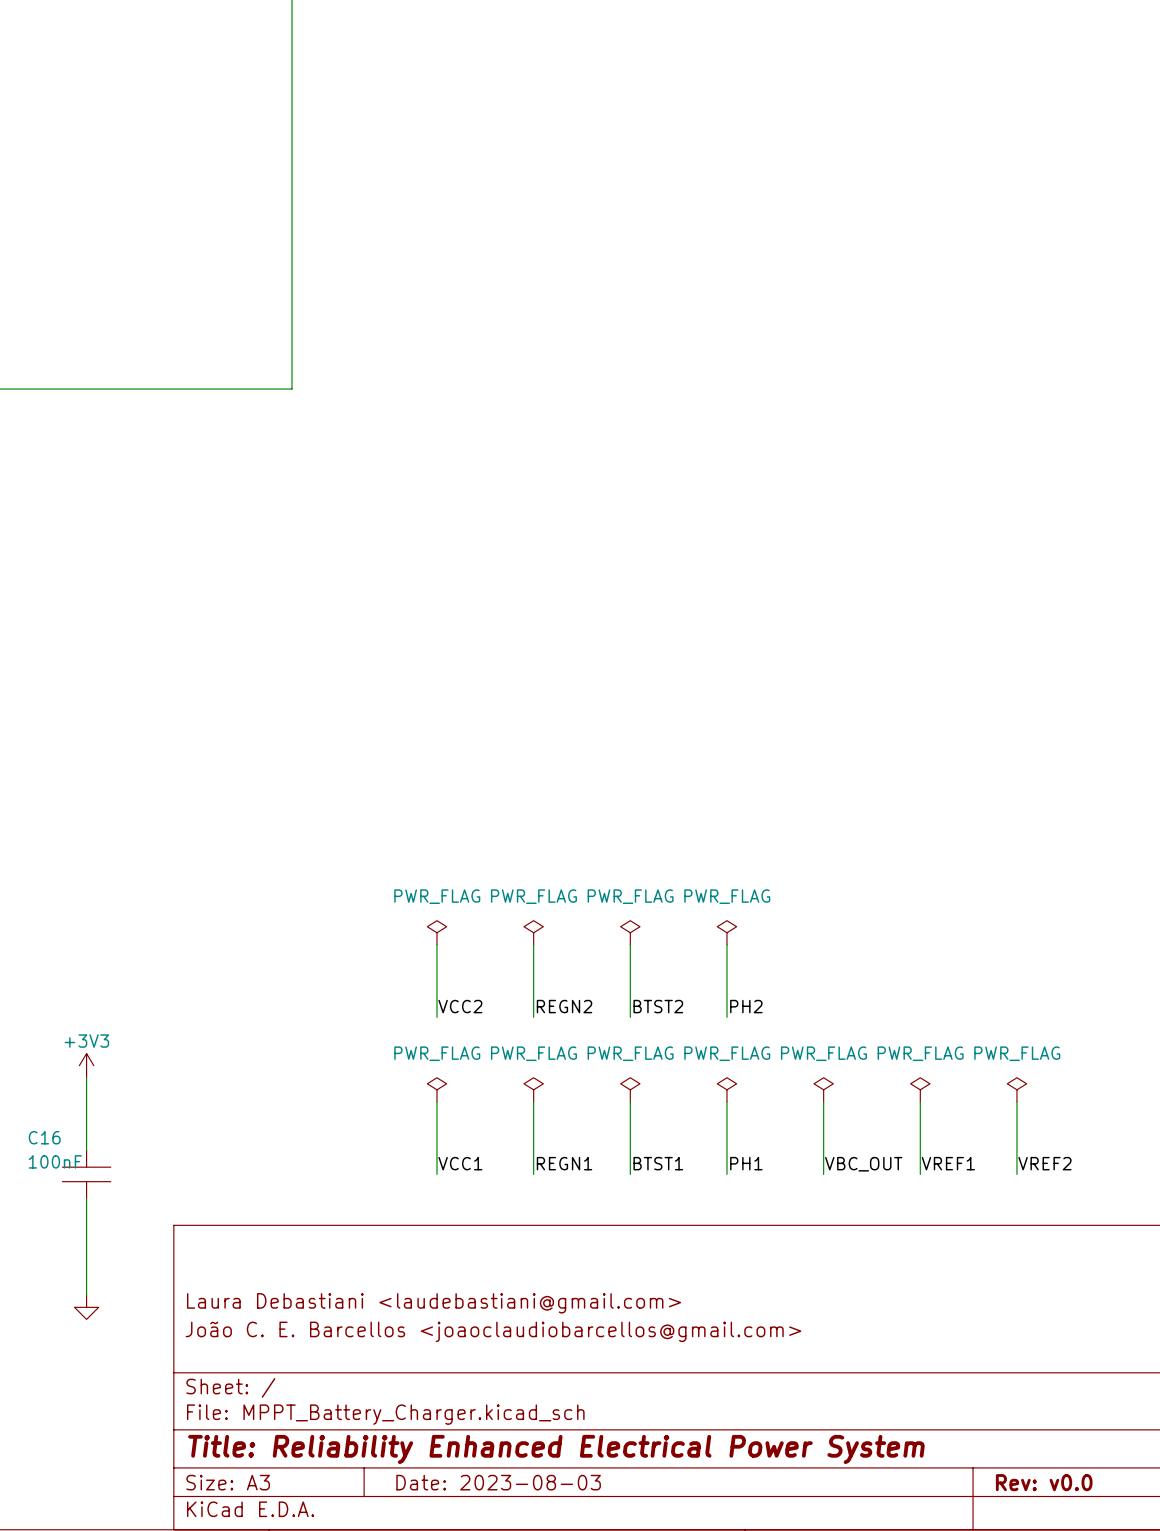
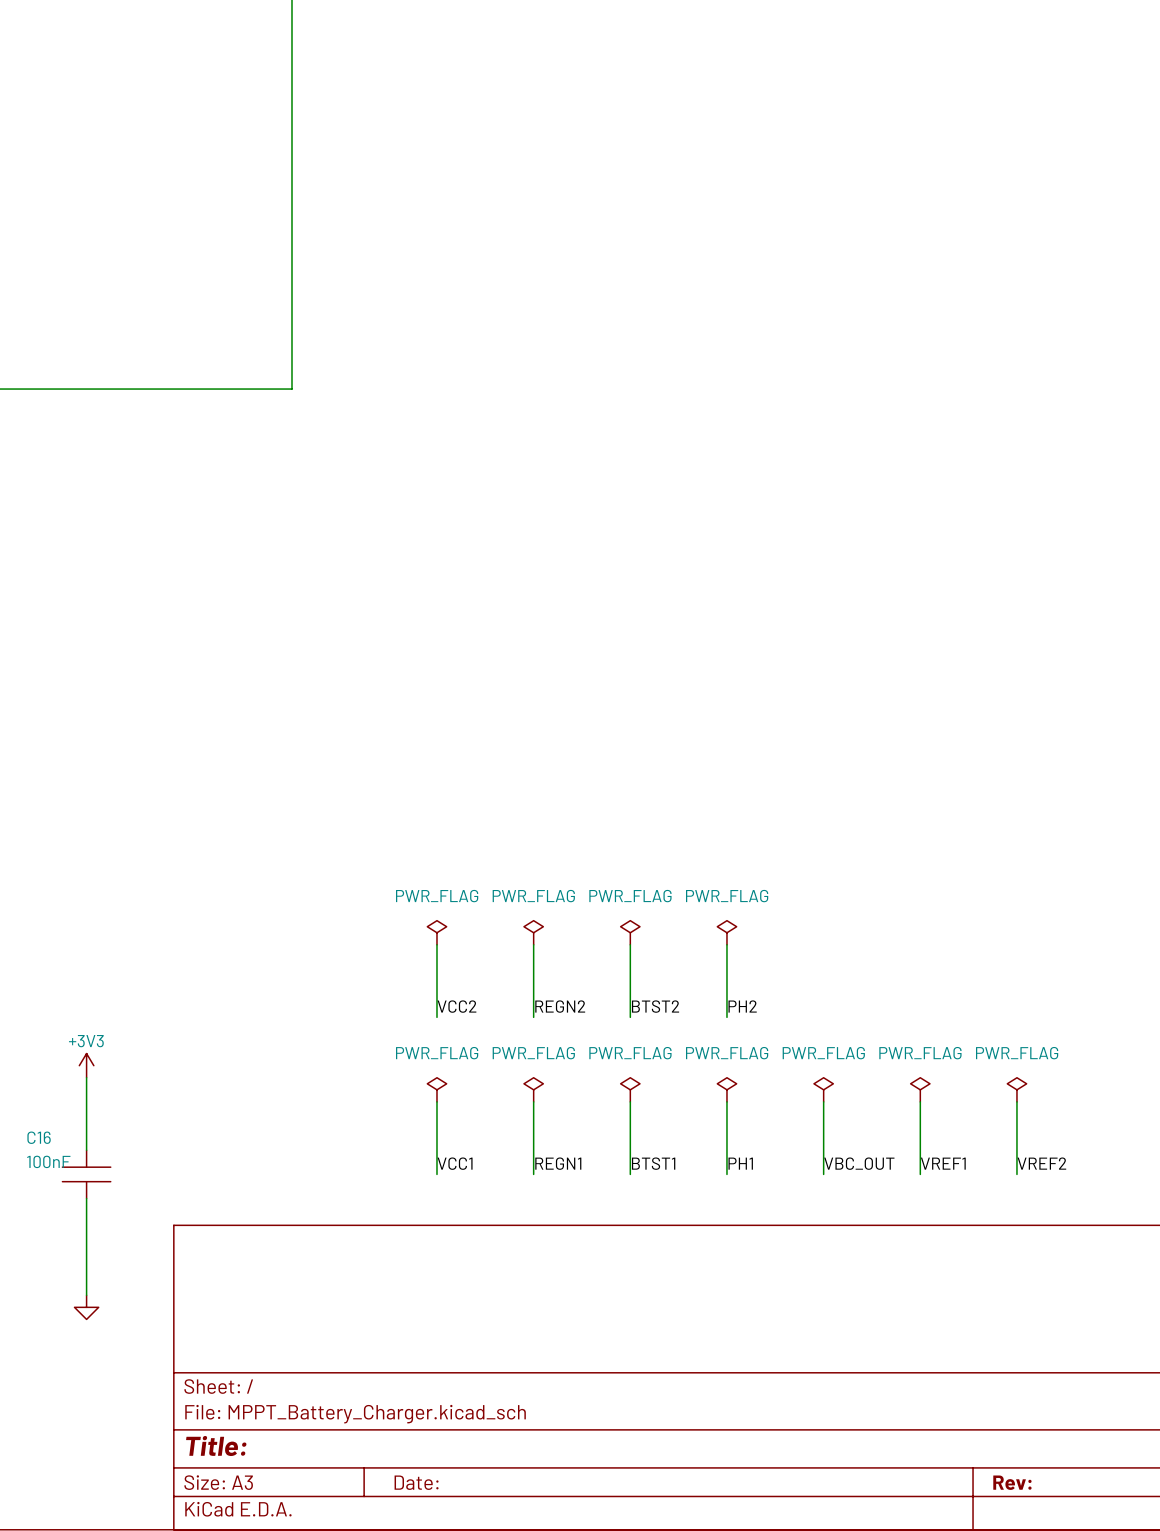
title block: Laura Debastiani <laudebastiani@gmail.com> (434, 1303) -> none
title block: João C. E. Barcellos <joaoclaudiobarcellos@gmail.com> (493, 1331) -> none
title block: Title: Reliability Enhanced Electrical Power System (556, 1449) -> Title: (216, 1446)
title block: Date: 2023-08-03 (498, 1482) -> Date: (416, 1482)
title block: Rev: v0.0 (1044, 1482) -> Rev: (1012, 1482)

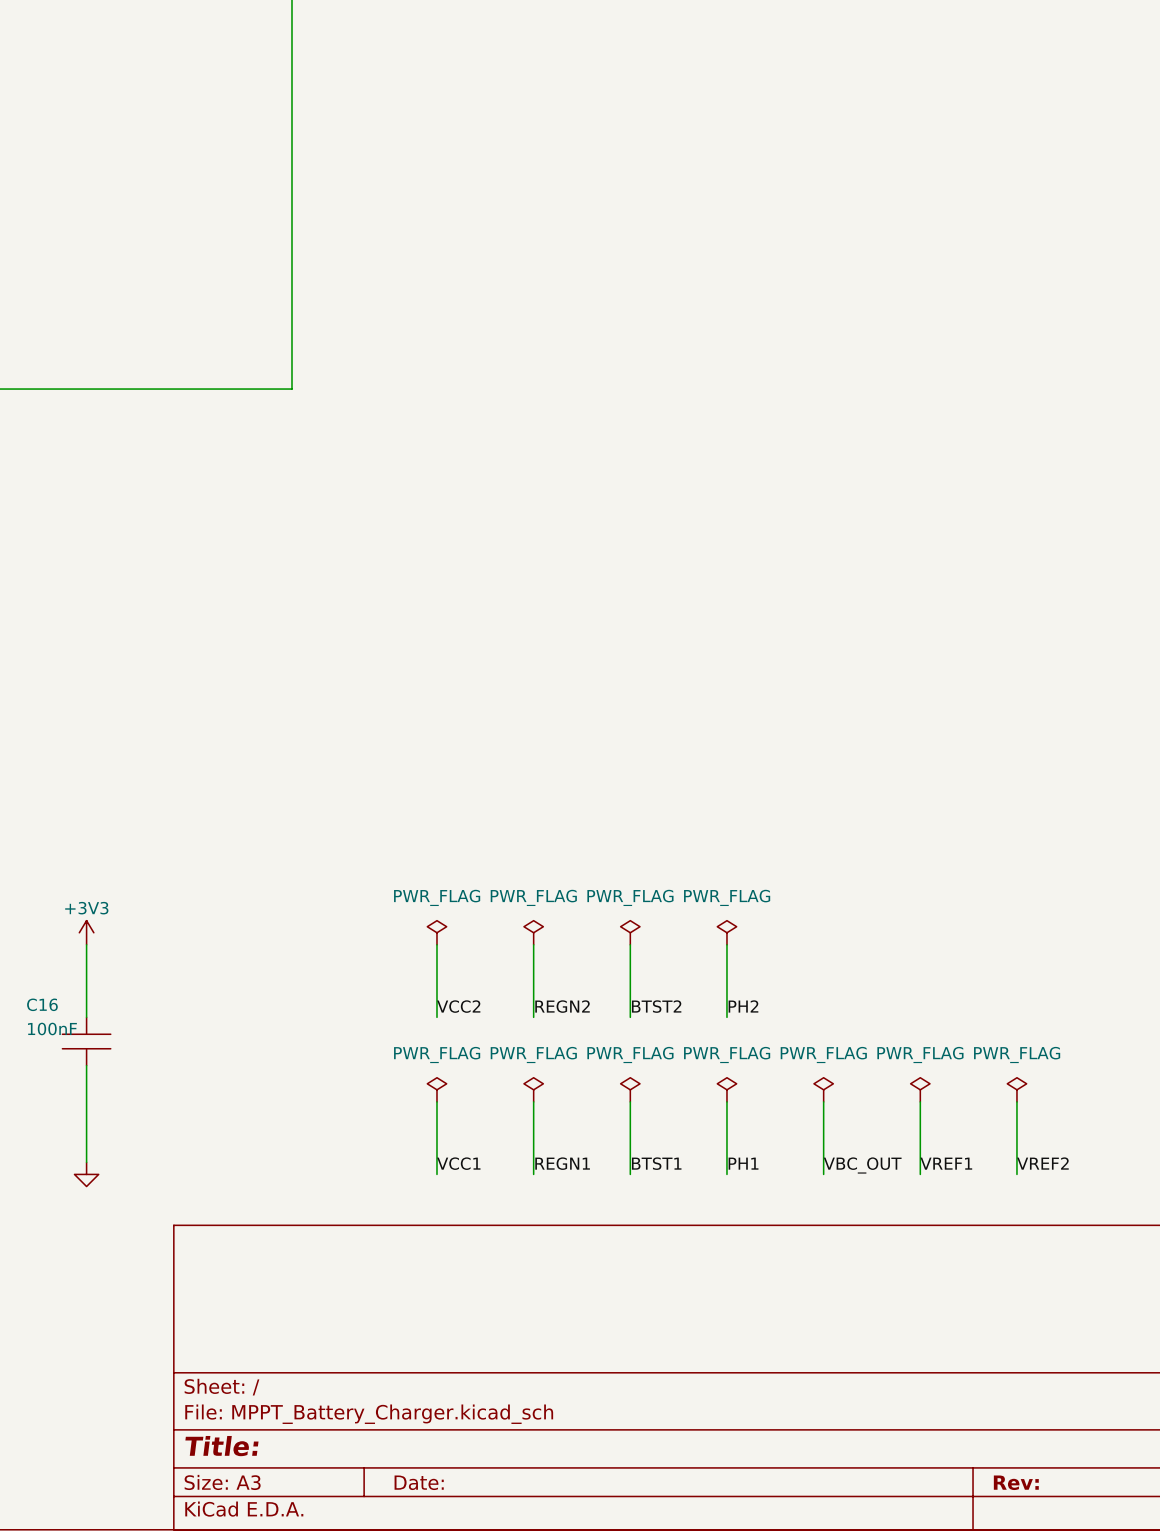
wire: none -> (86, 944) (86, 1017)
power symbol position: +3V3 (86, 1065) -> +3V3 (86, 932)
C16 position: (86, 1174) -> (86, 1041)
wire: (86, 1198) (86, 1295) -> none
power symbol position: (86, 1307) -> (86, 1174)

